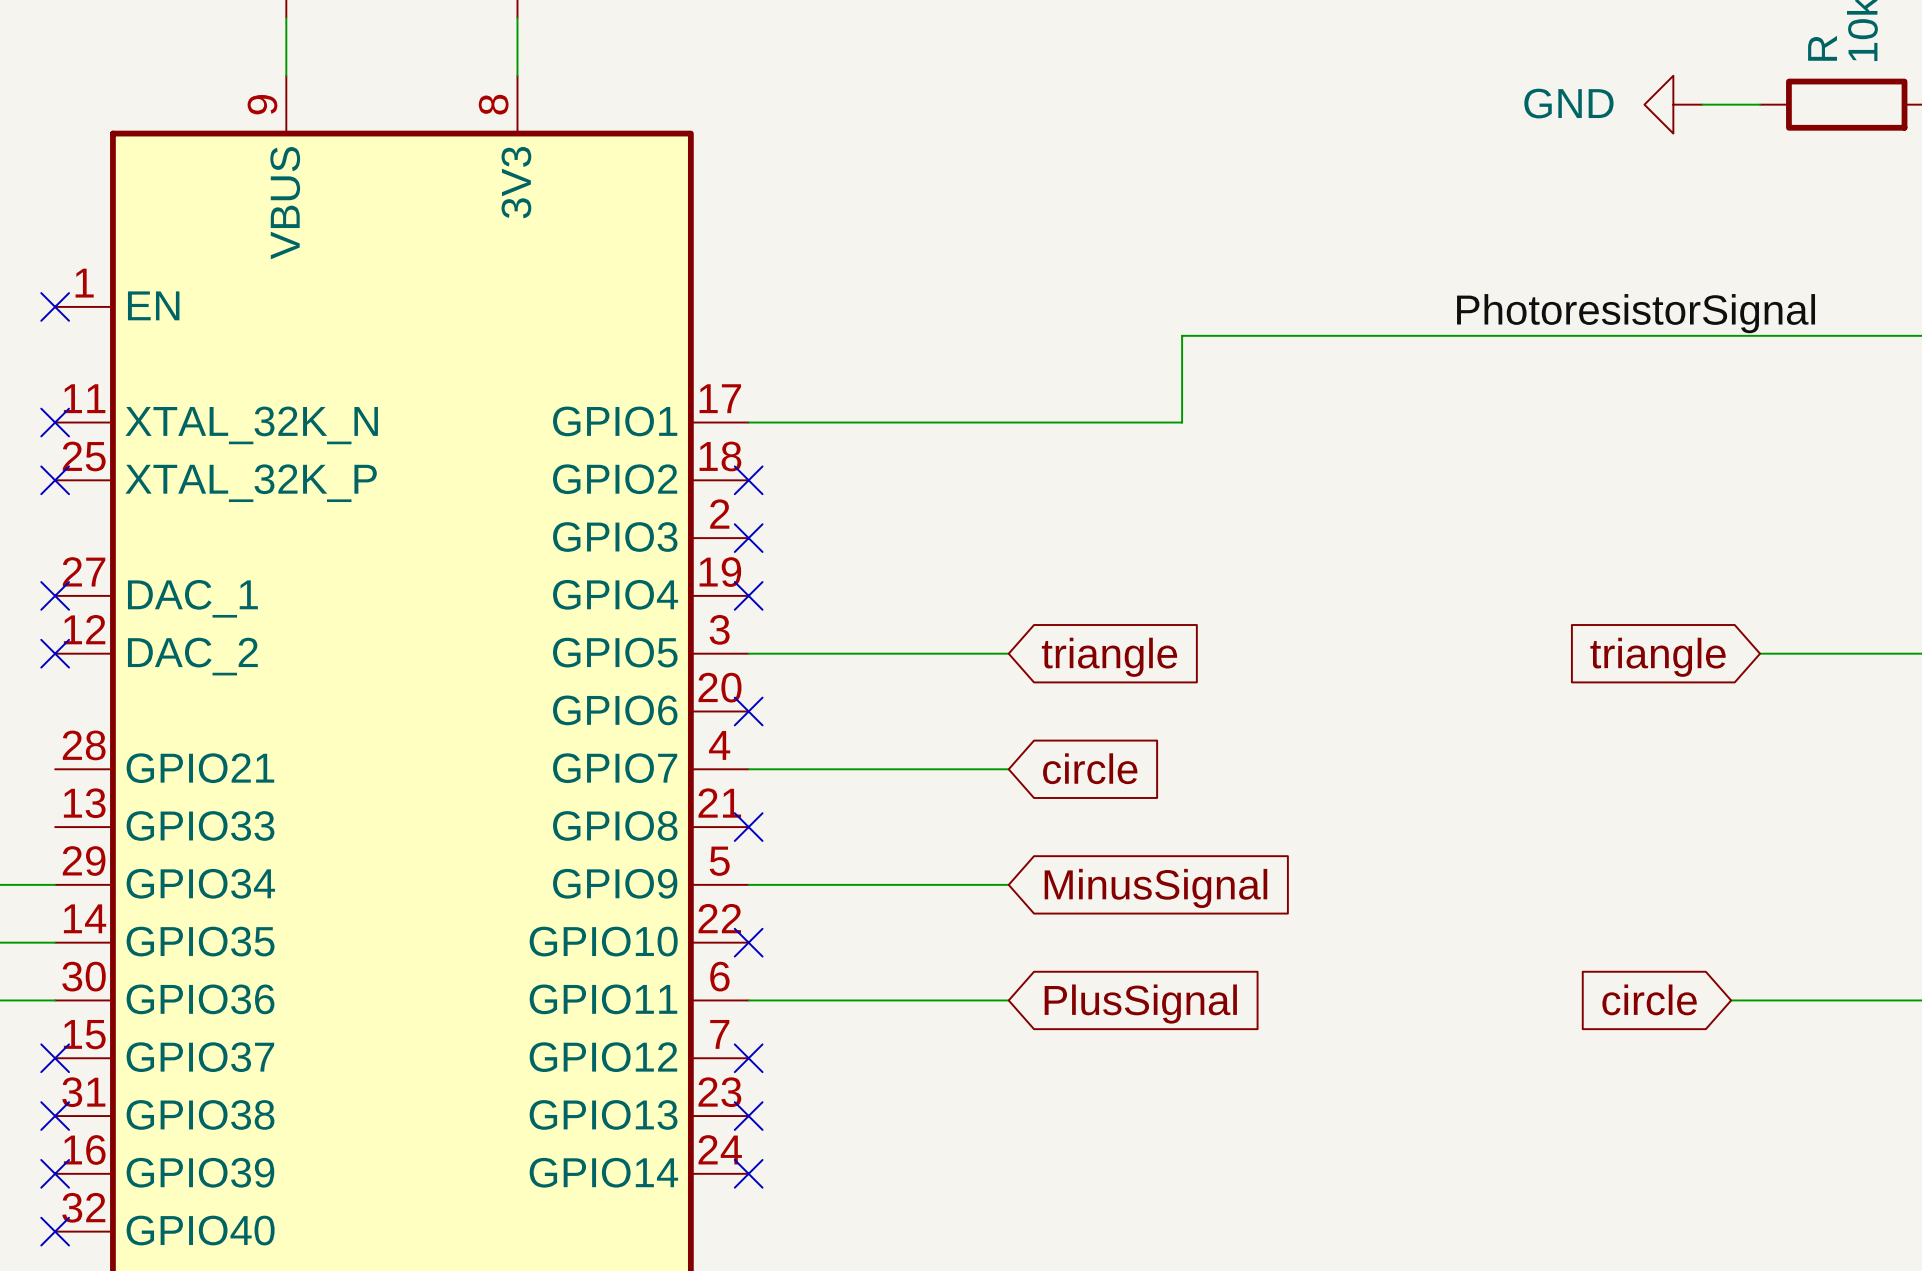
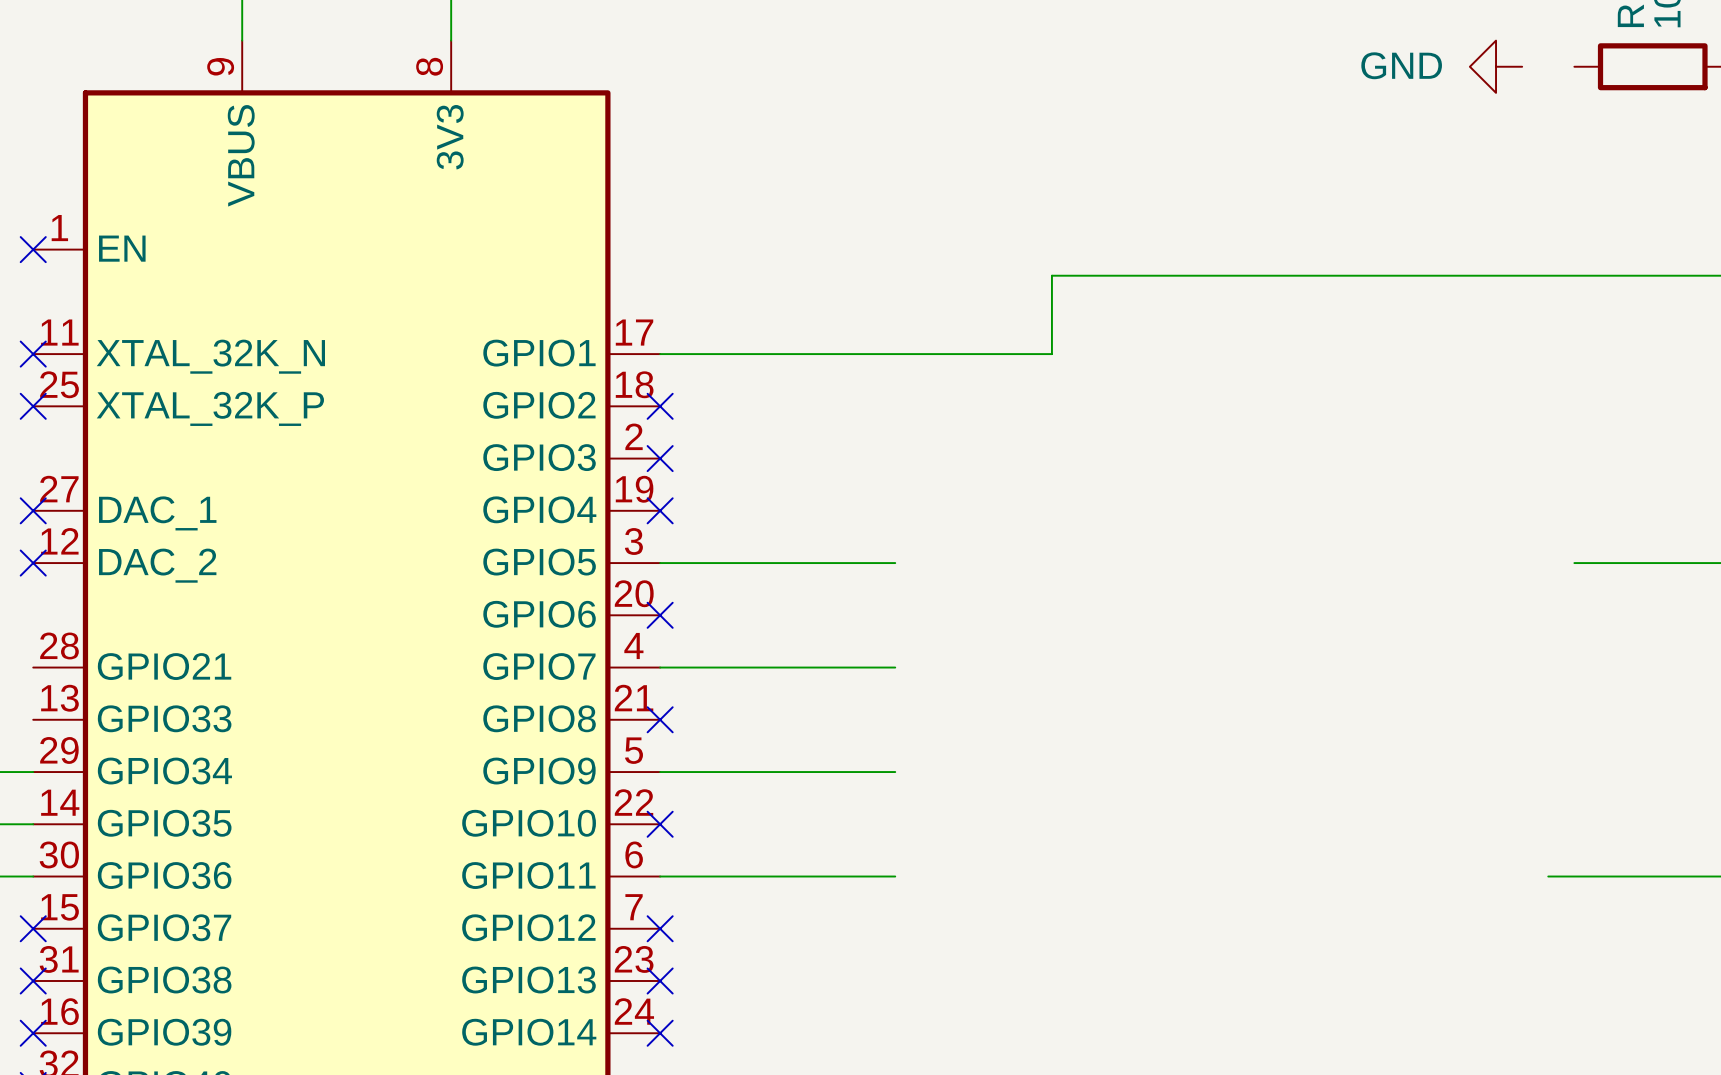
wire: (1702, 104) (1760, 104) -> none
label: PhotoresistorSignal (1636, 313) -> none
global label: triangle (1109, 657) -> none
global label: triangle (1658, 657) -> none
global label: circle (1090, 768) -> none
global label: MinusSignal (1155, 888) -> none
global label: circle (1649, 999) -> none
global label: PlusSignal (1140, 1004) -> none

